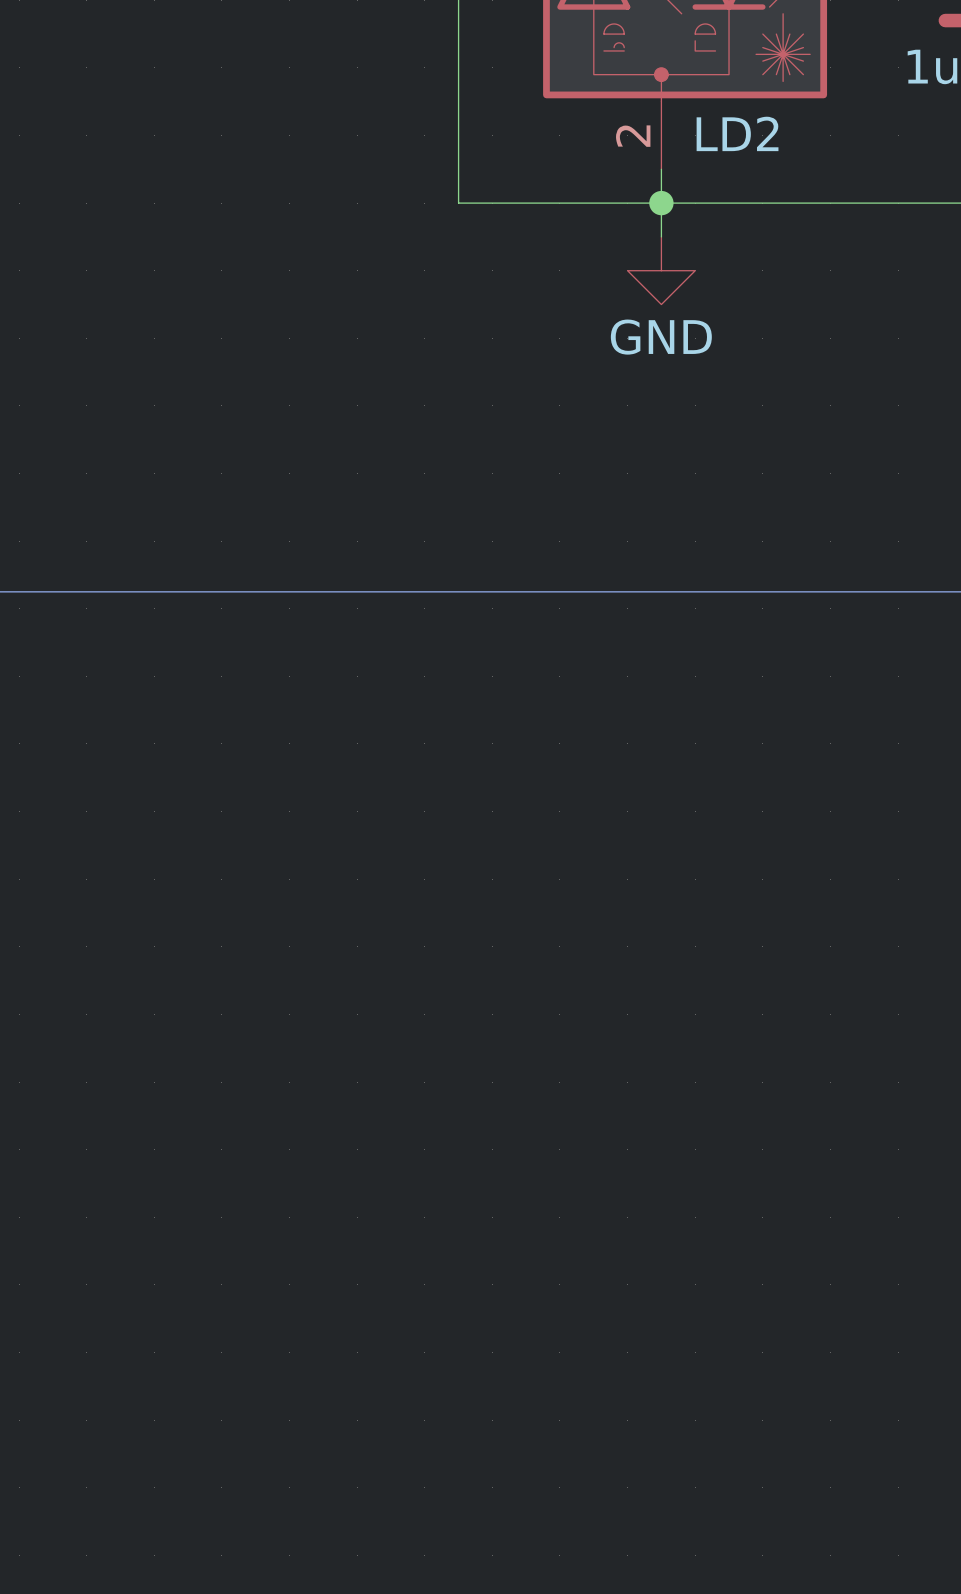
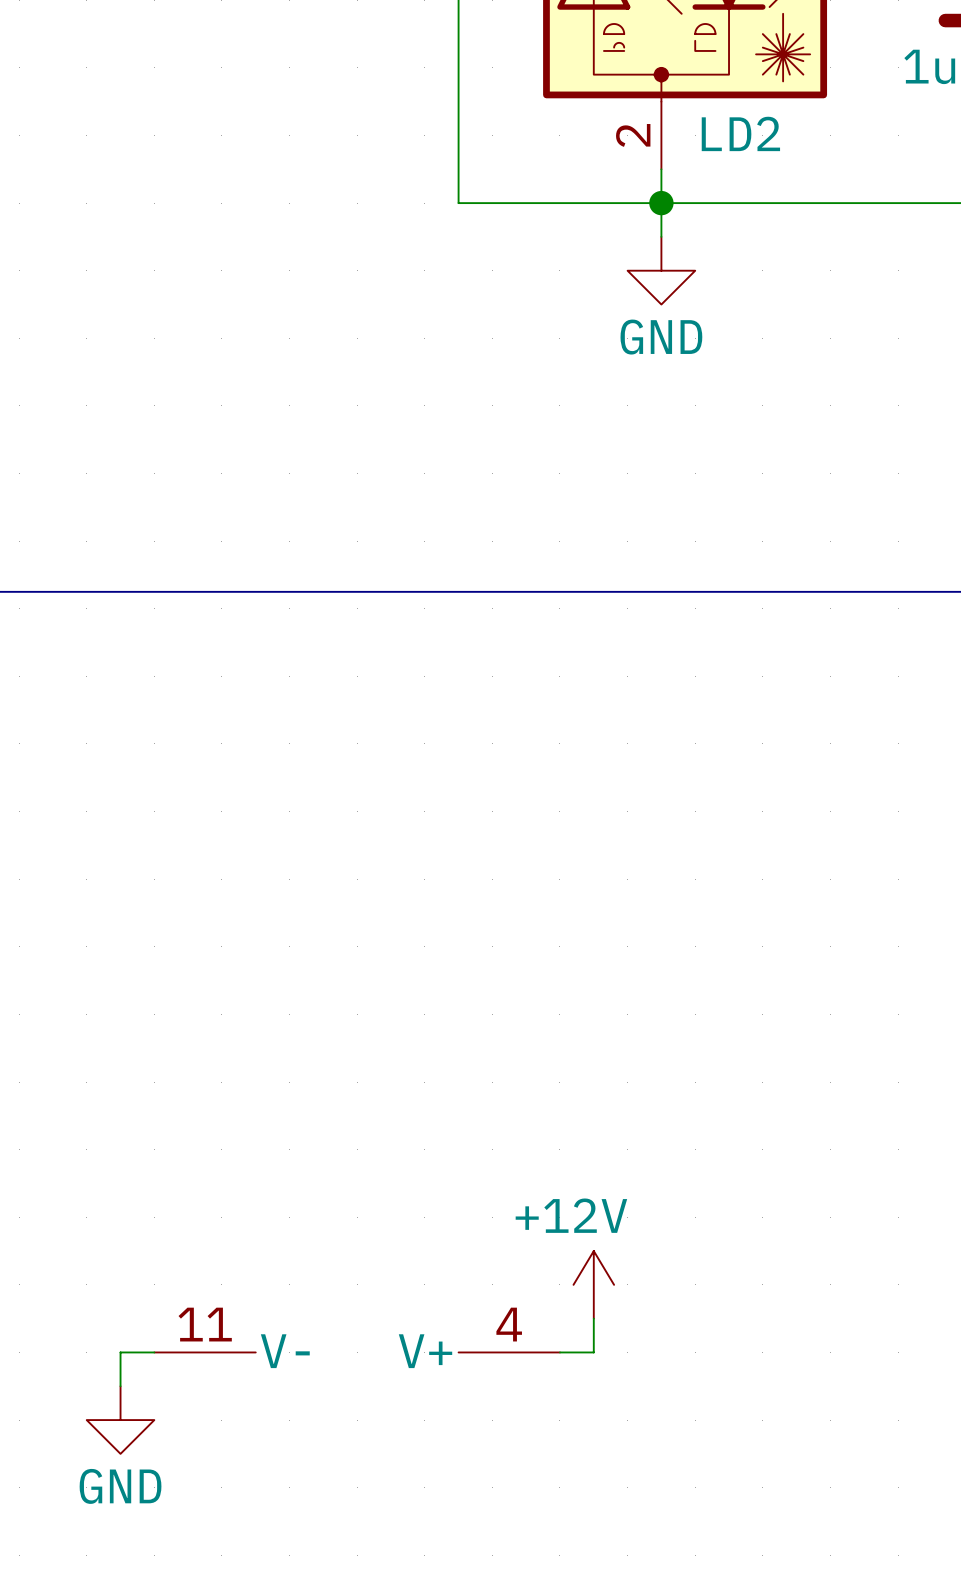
power symbol: none -> +12V (593, 1284)
wire: none -> (593, 1318) (593, 1352) (559, 1352)
wire: none -> (154, 1352) (120, 1352) (120, 1386)
part: none -> (357, 1352)
power symbol: none -> GND (120, 1420)

